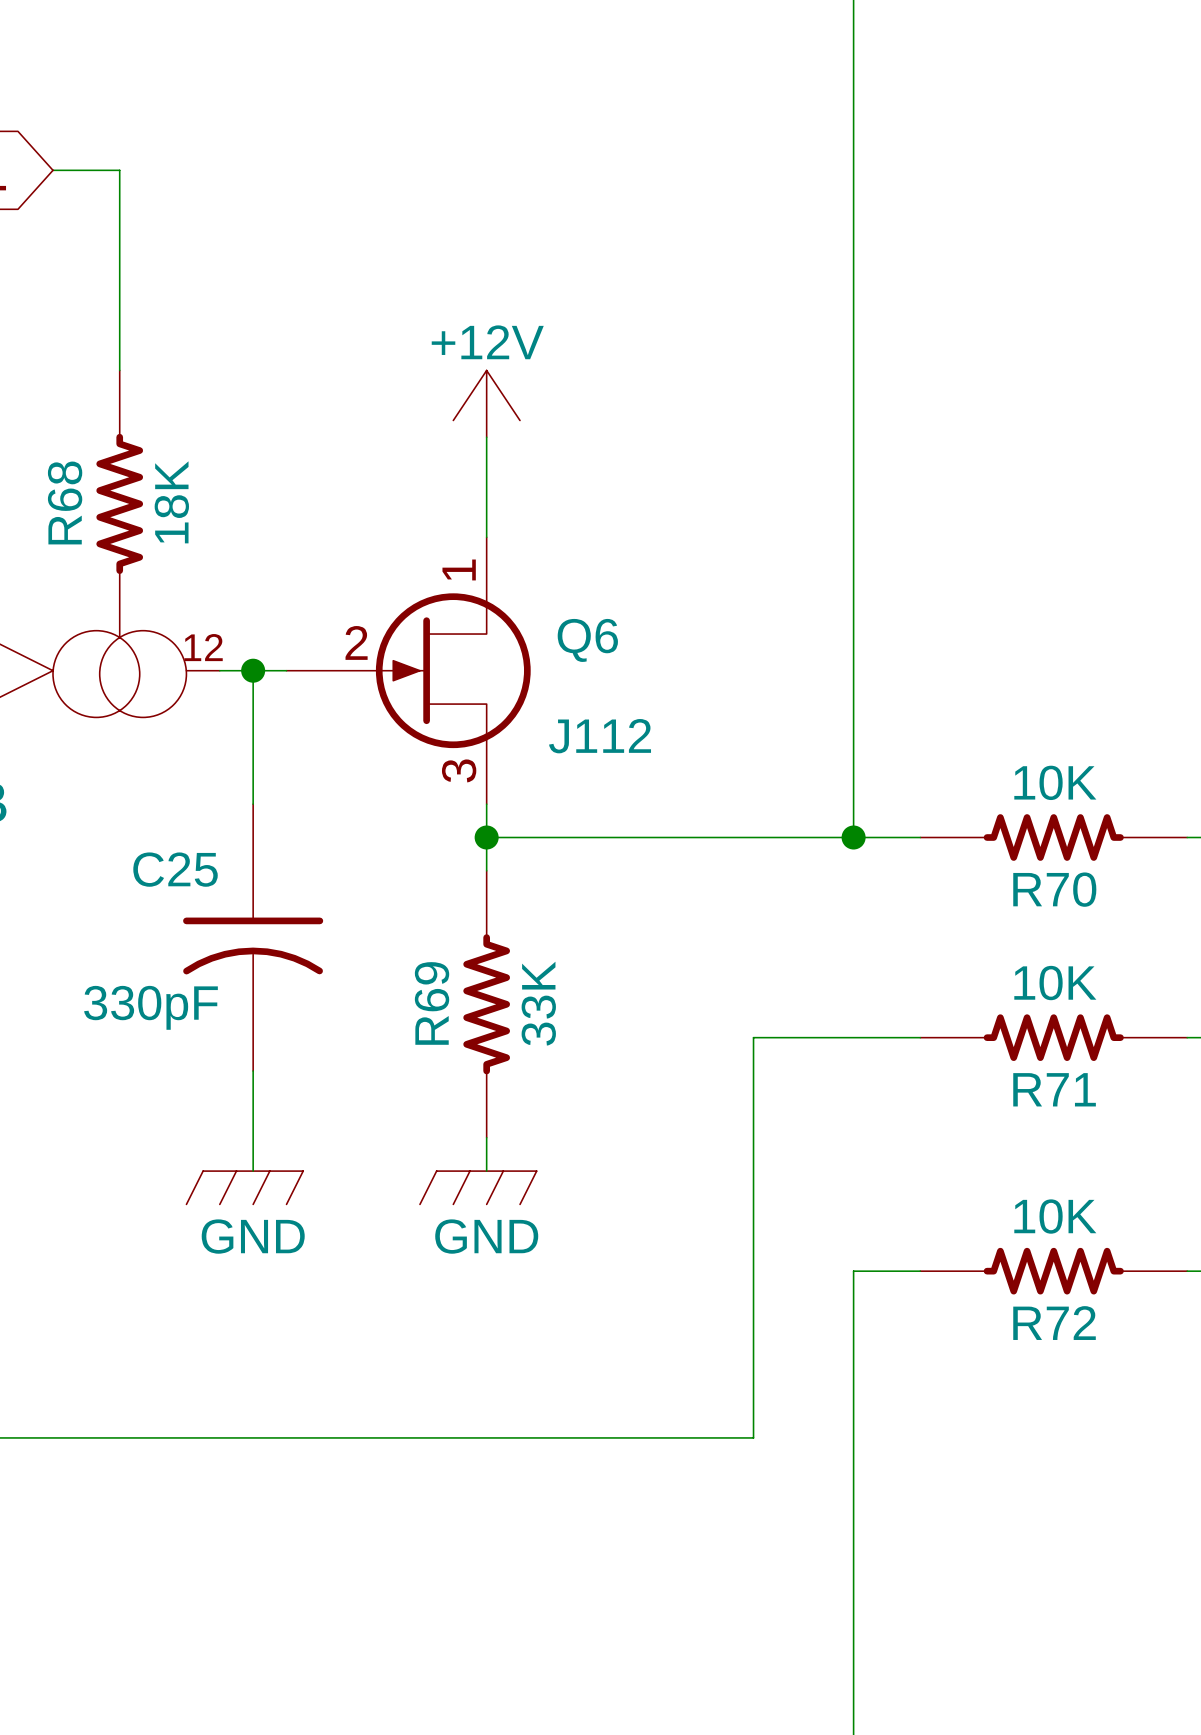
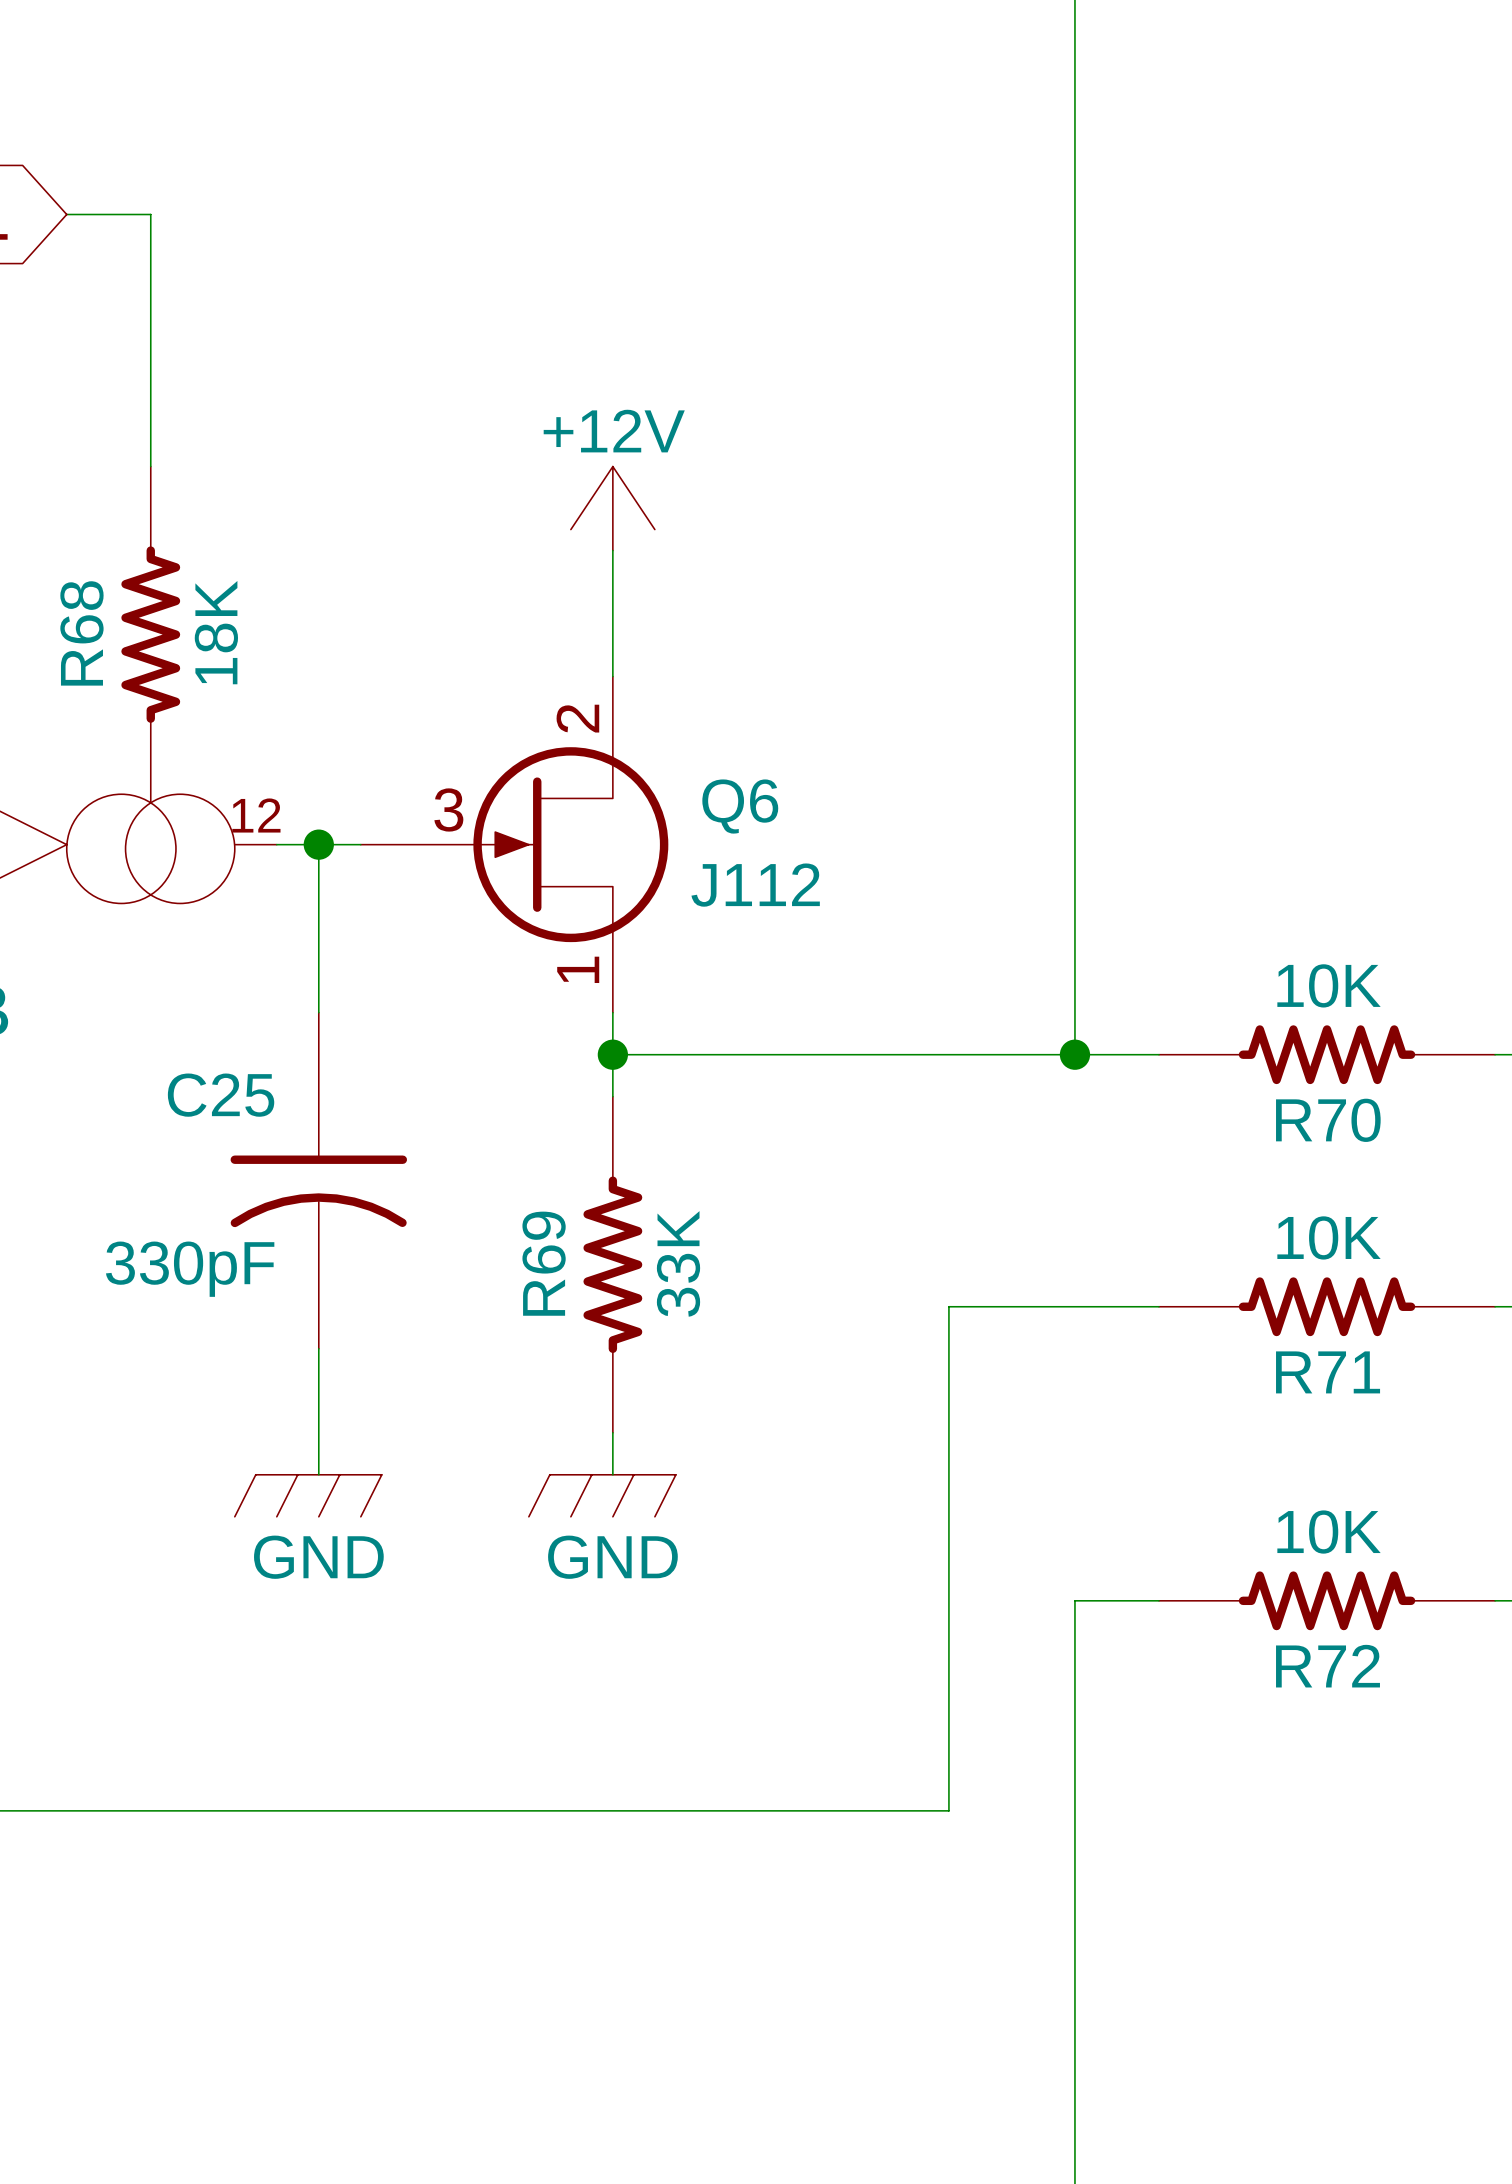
Q6 pin number: 1 (459, 569) -> 2 (577, 718)
Q6 pin number: 2 (356, 642) -> 3 (448, 809)
Q6 value position: J112 (600, 736) -> J112 (755, 885)
Q6 pin number: 3 (459, 770) -> 1 (578, 969)

